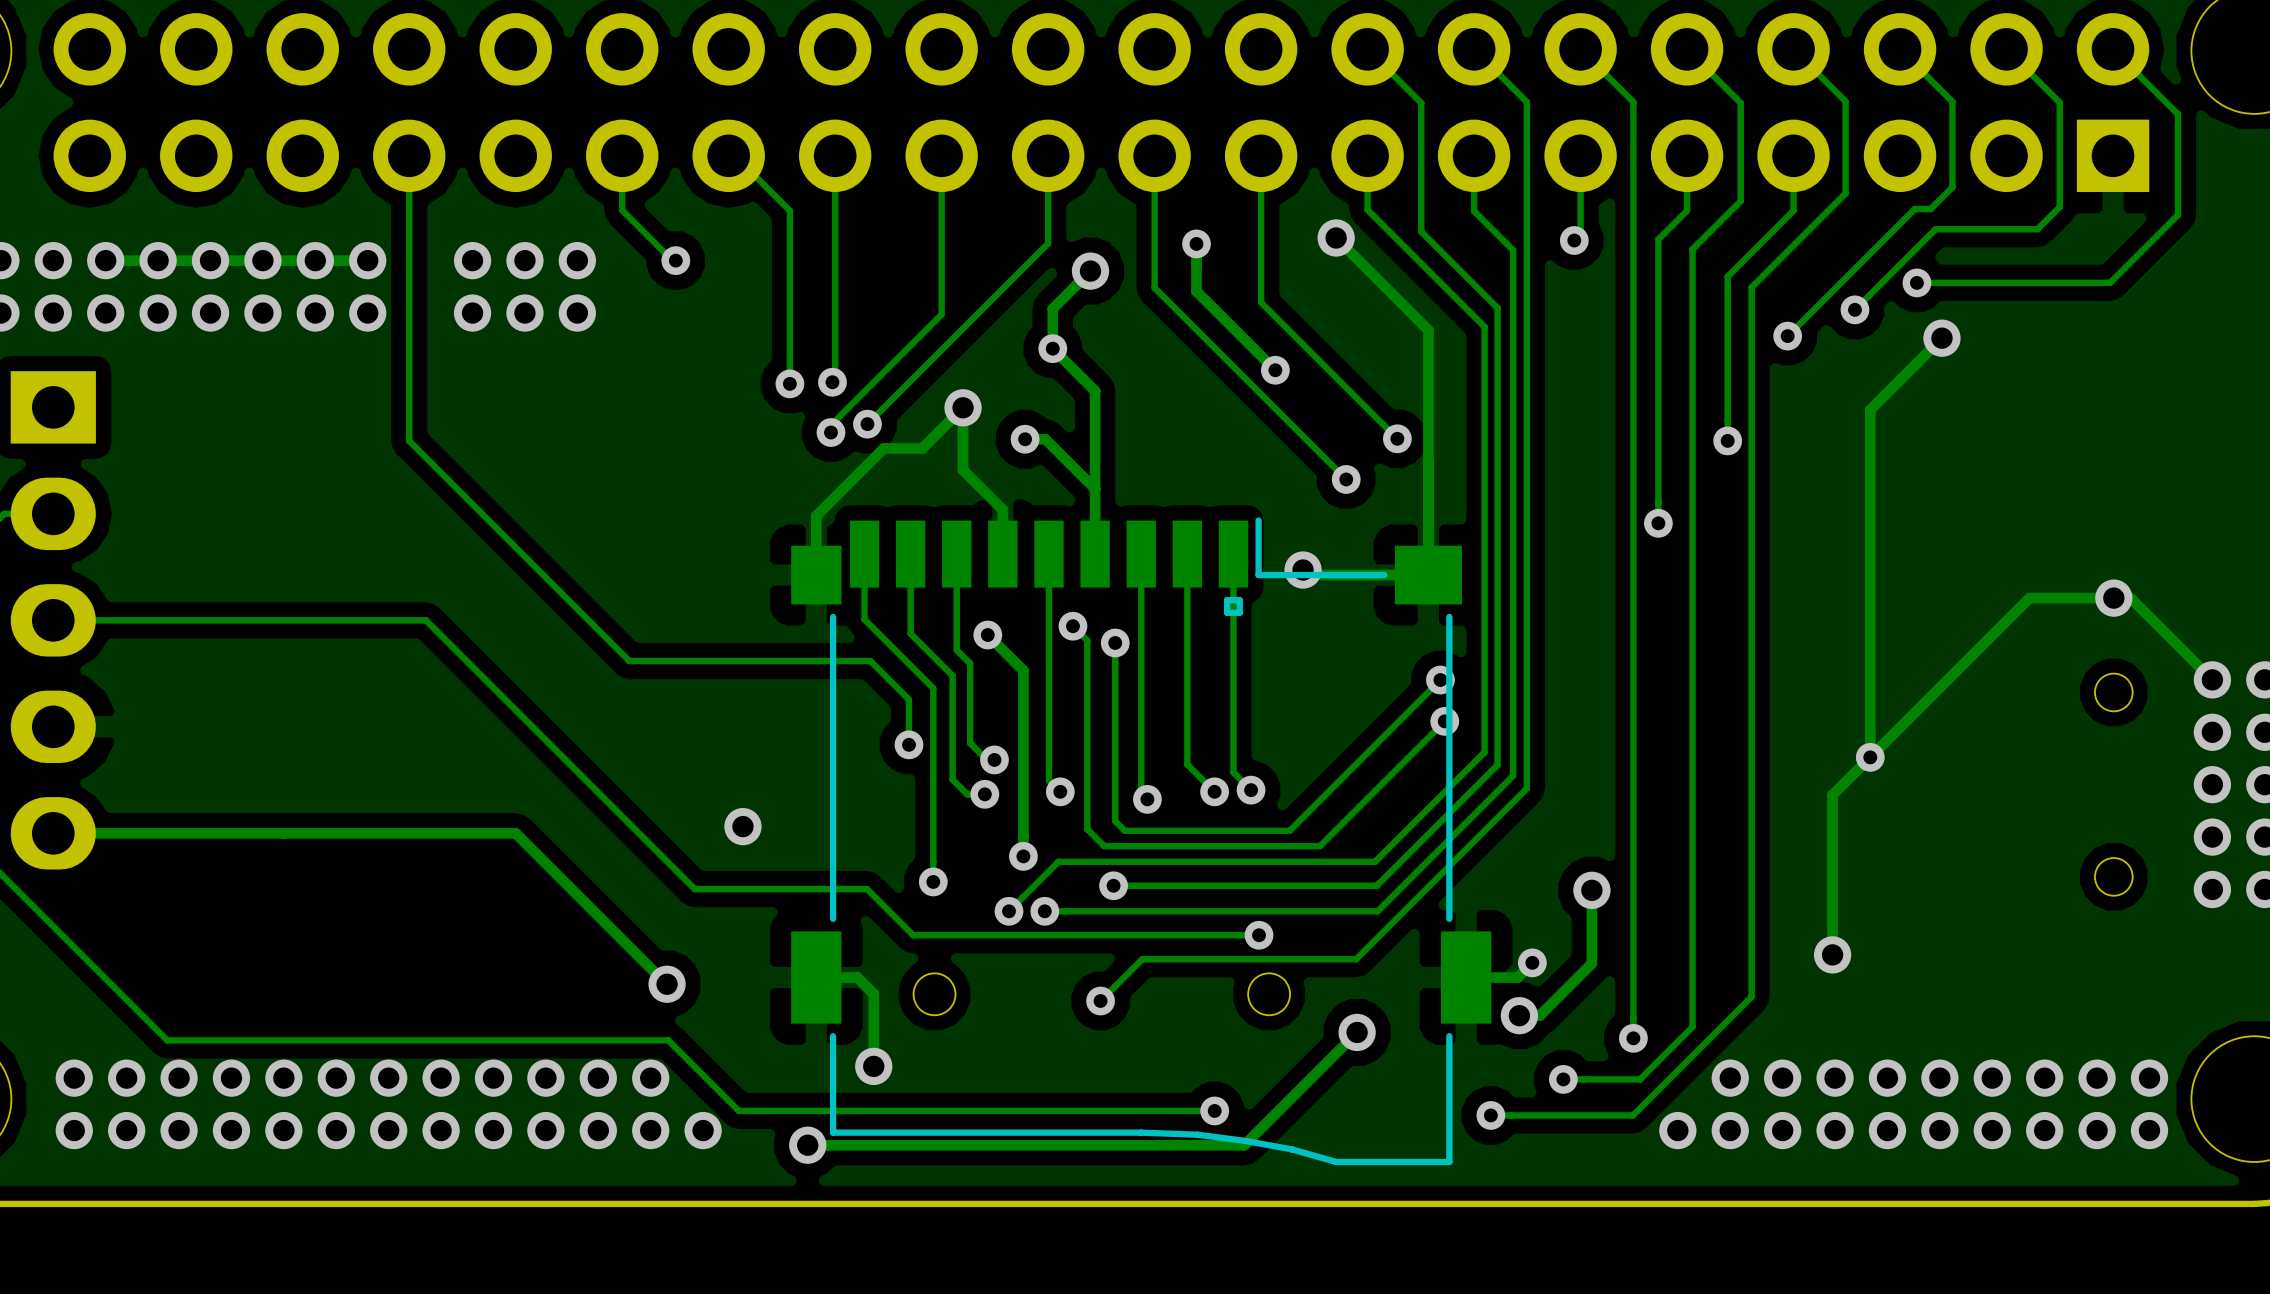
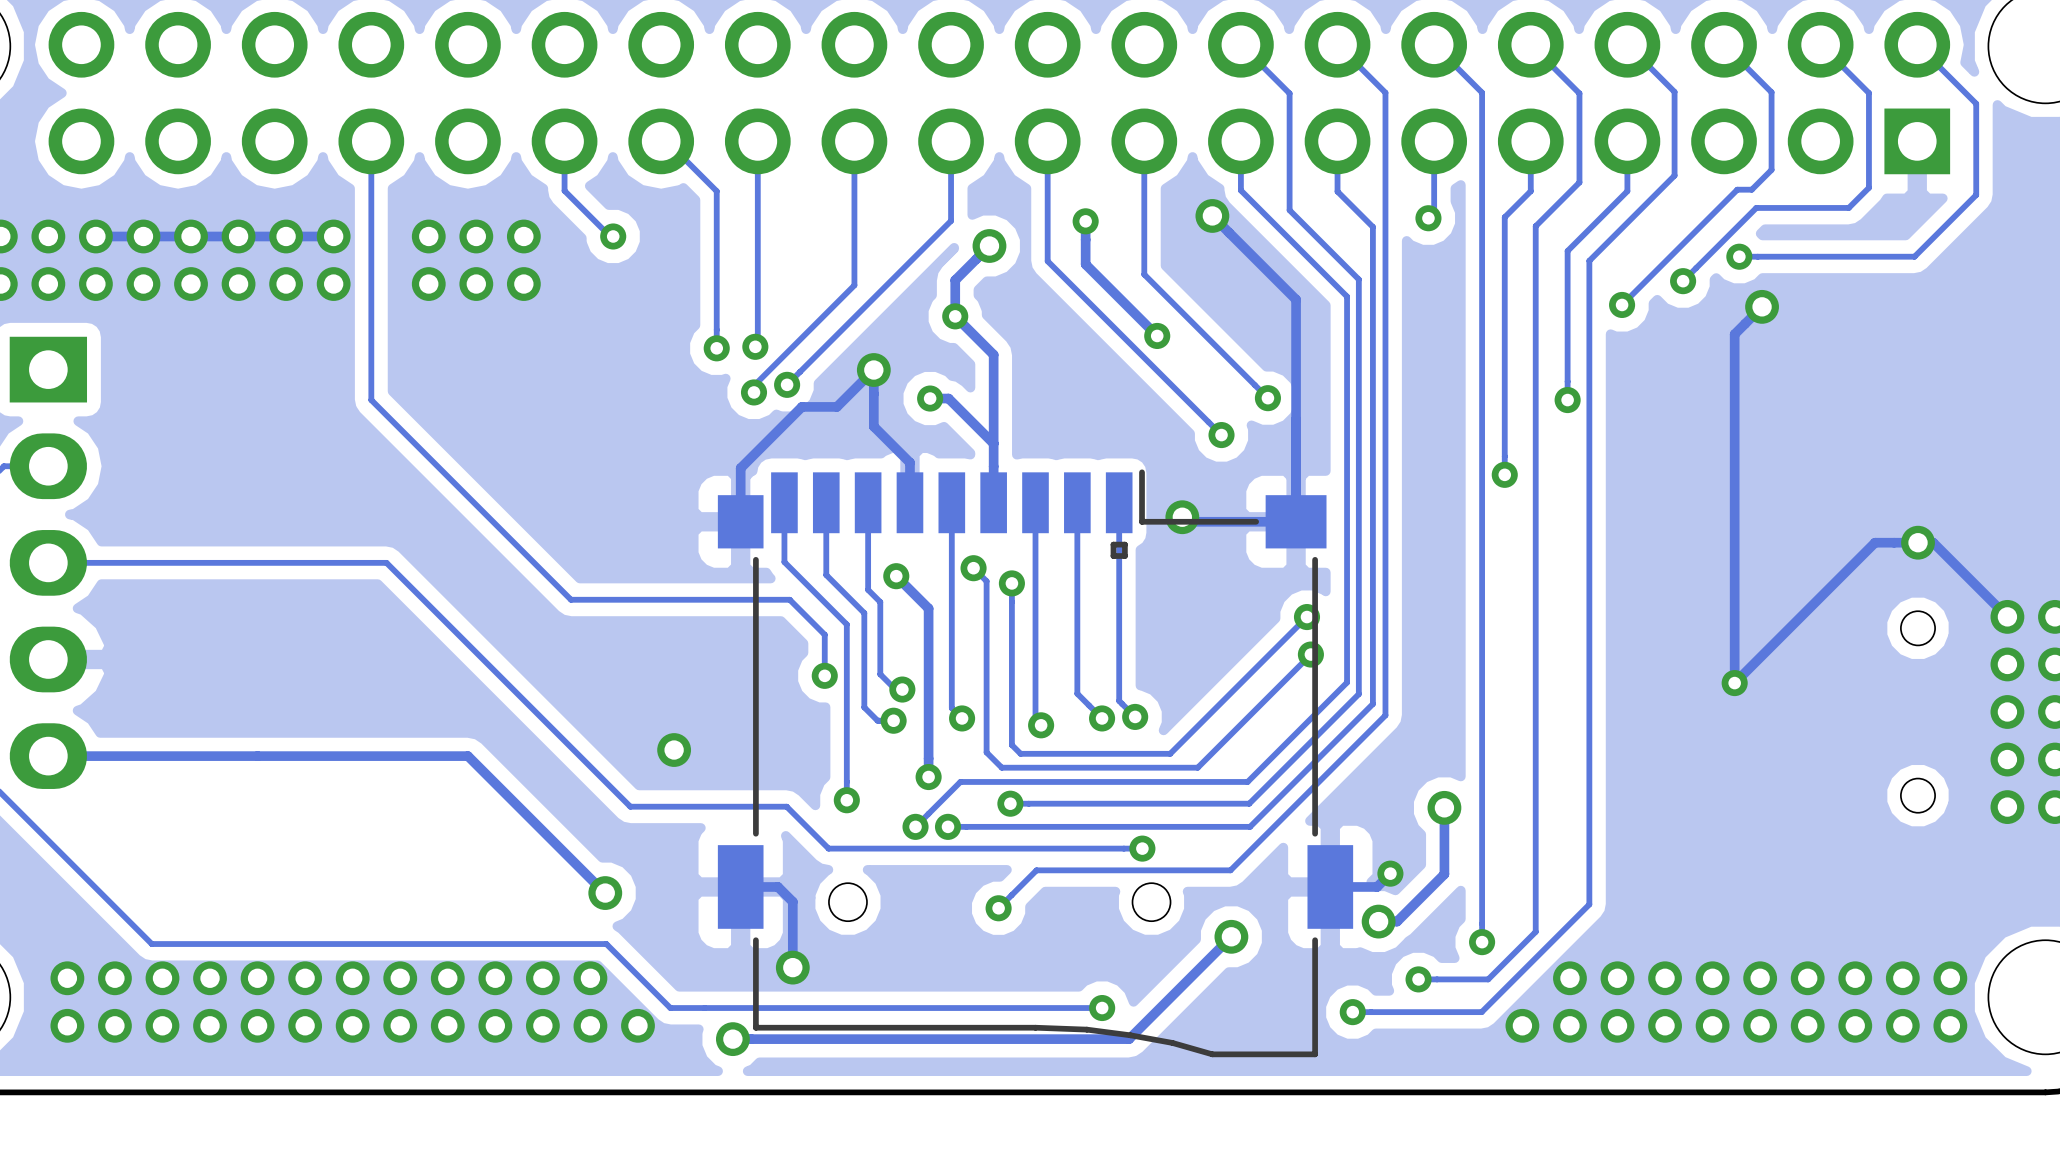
track: (1911, 368) (1870, 409) (1870, 757) -> (1734, 334) (1734, 683) (1875, 542)
track: (2066, 598) (2029, 598) (1832, 795) (1832, 954) -> none
via position: (1870, 757) -> (1734, 683)
via: (1832, 954) -> none

